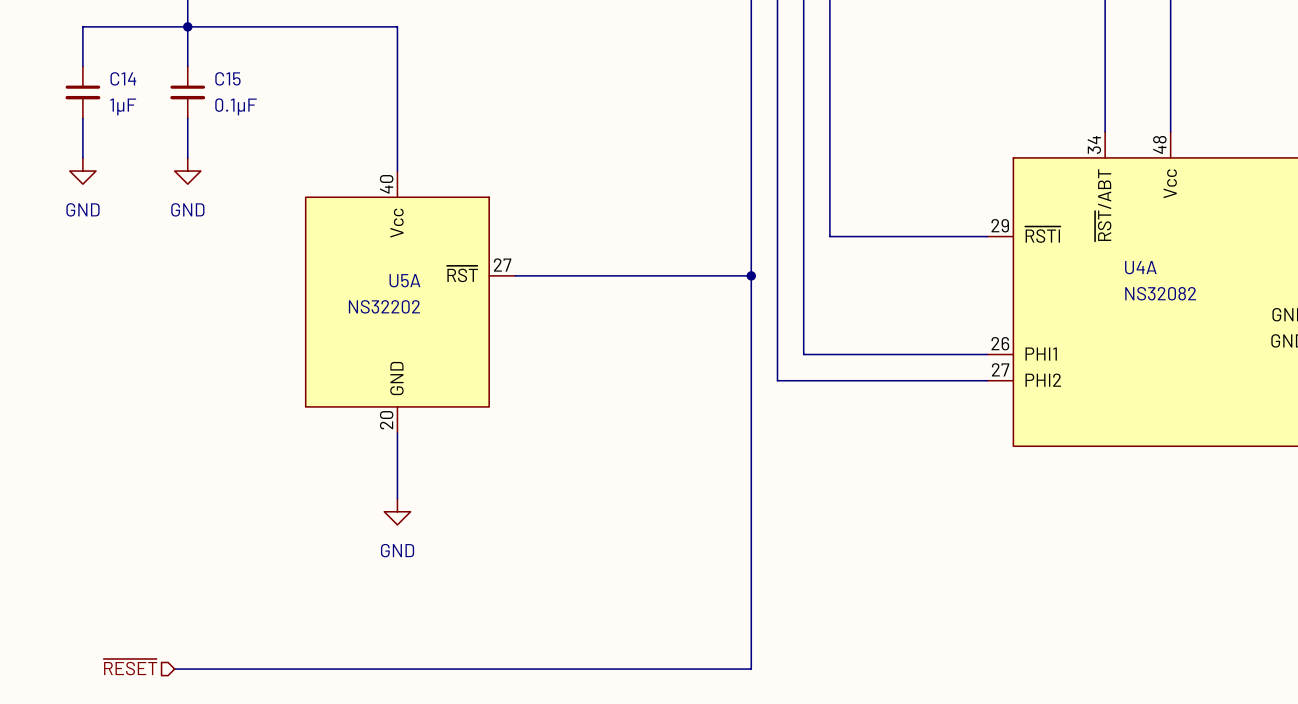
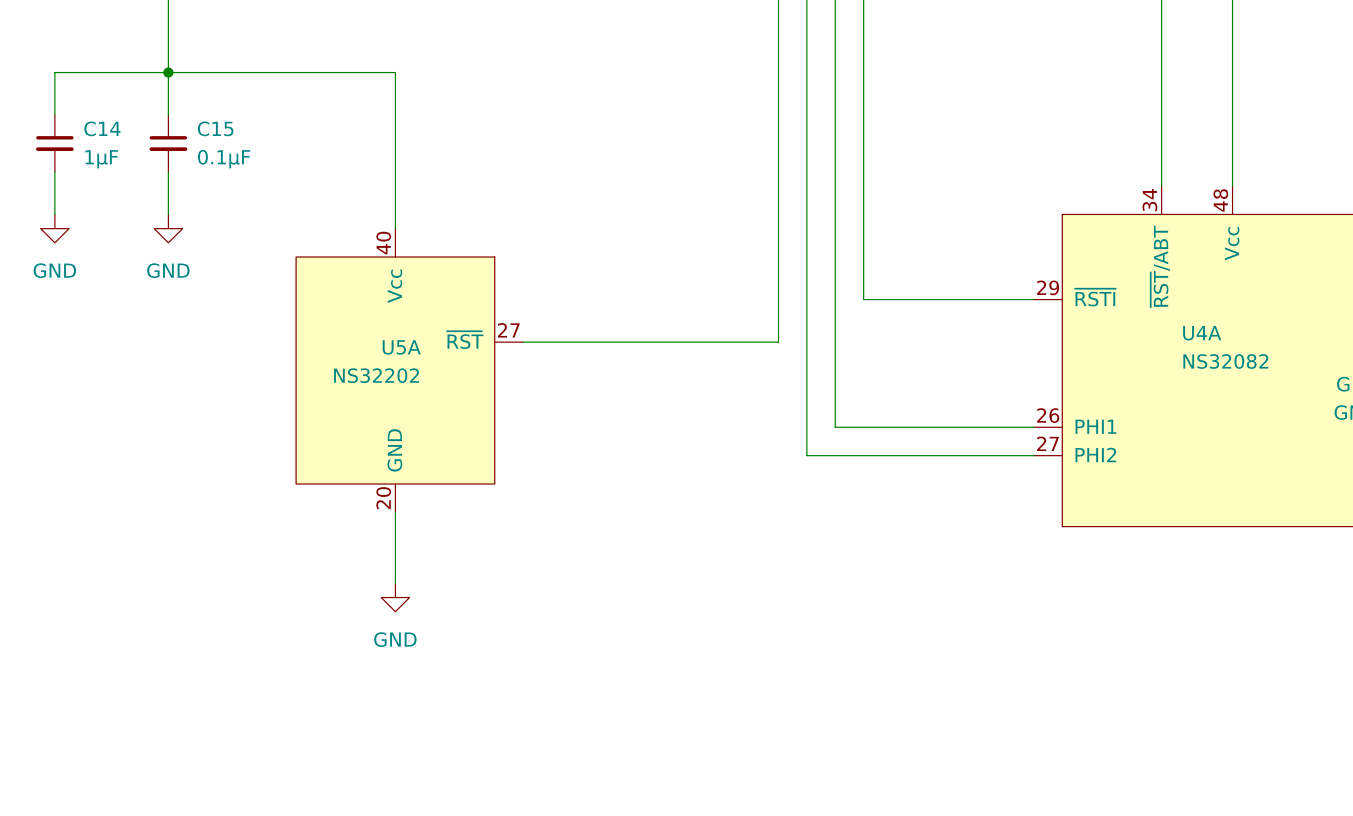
wire: (751, 275) (751, 669) (174, 669) -> none
junction: (751, 275) -> none
hierarchical label: ~{RESET} (130, 667) -> none

